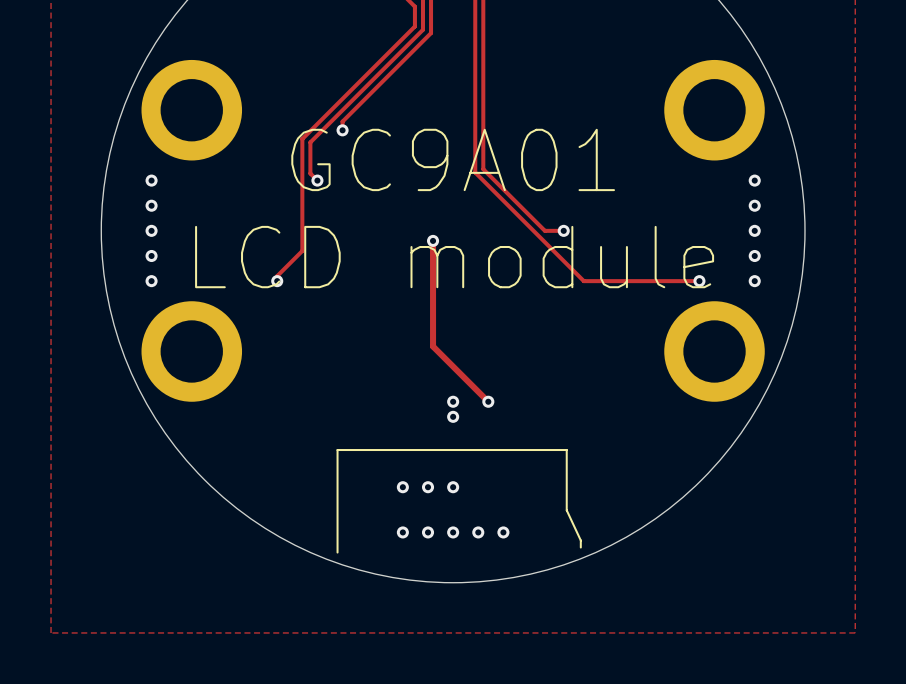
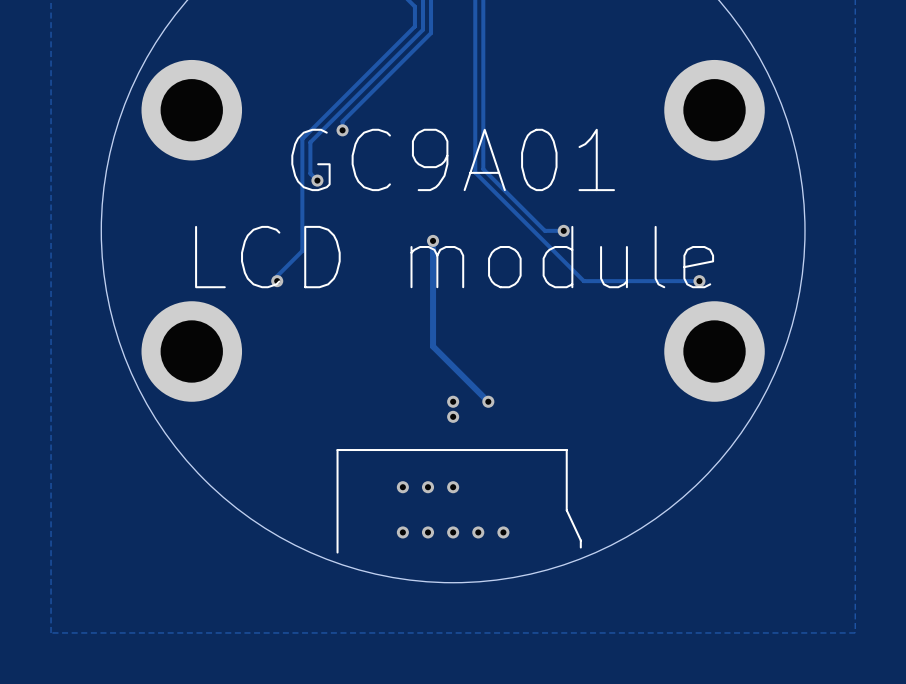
via: (151, 180) -> none
via: (754, 180) -> none
via: (151, 205) -> none
via: (754, 205) -> none
via: (151, 230) -> none
via: (754, 230) -> none
via: (151, 255) -> none
via: (754, 255) -> none
via: (151, 281) -> none
via: (754, 281) -> none

